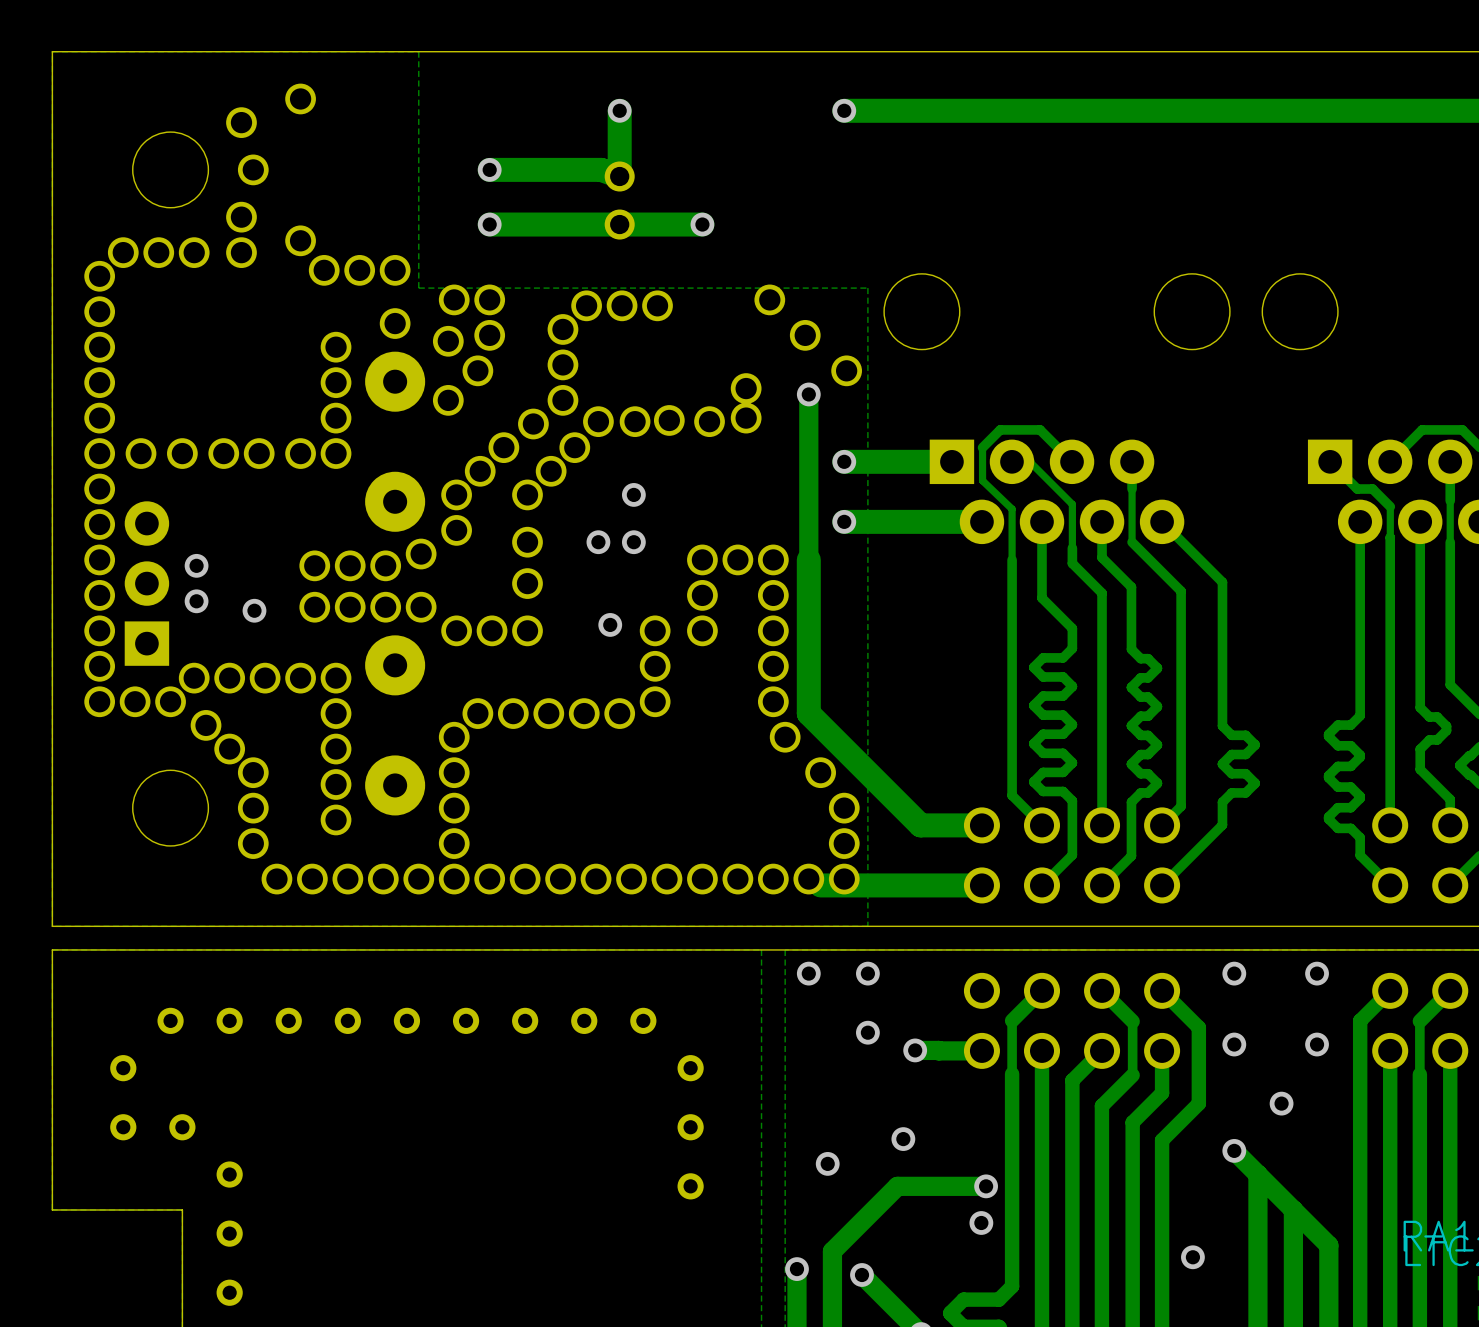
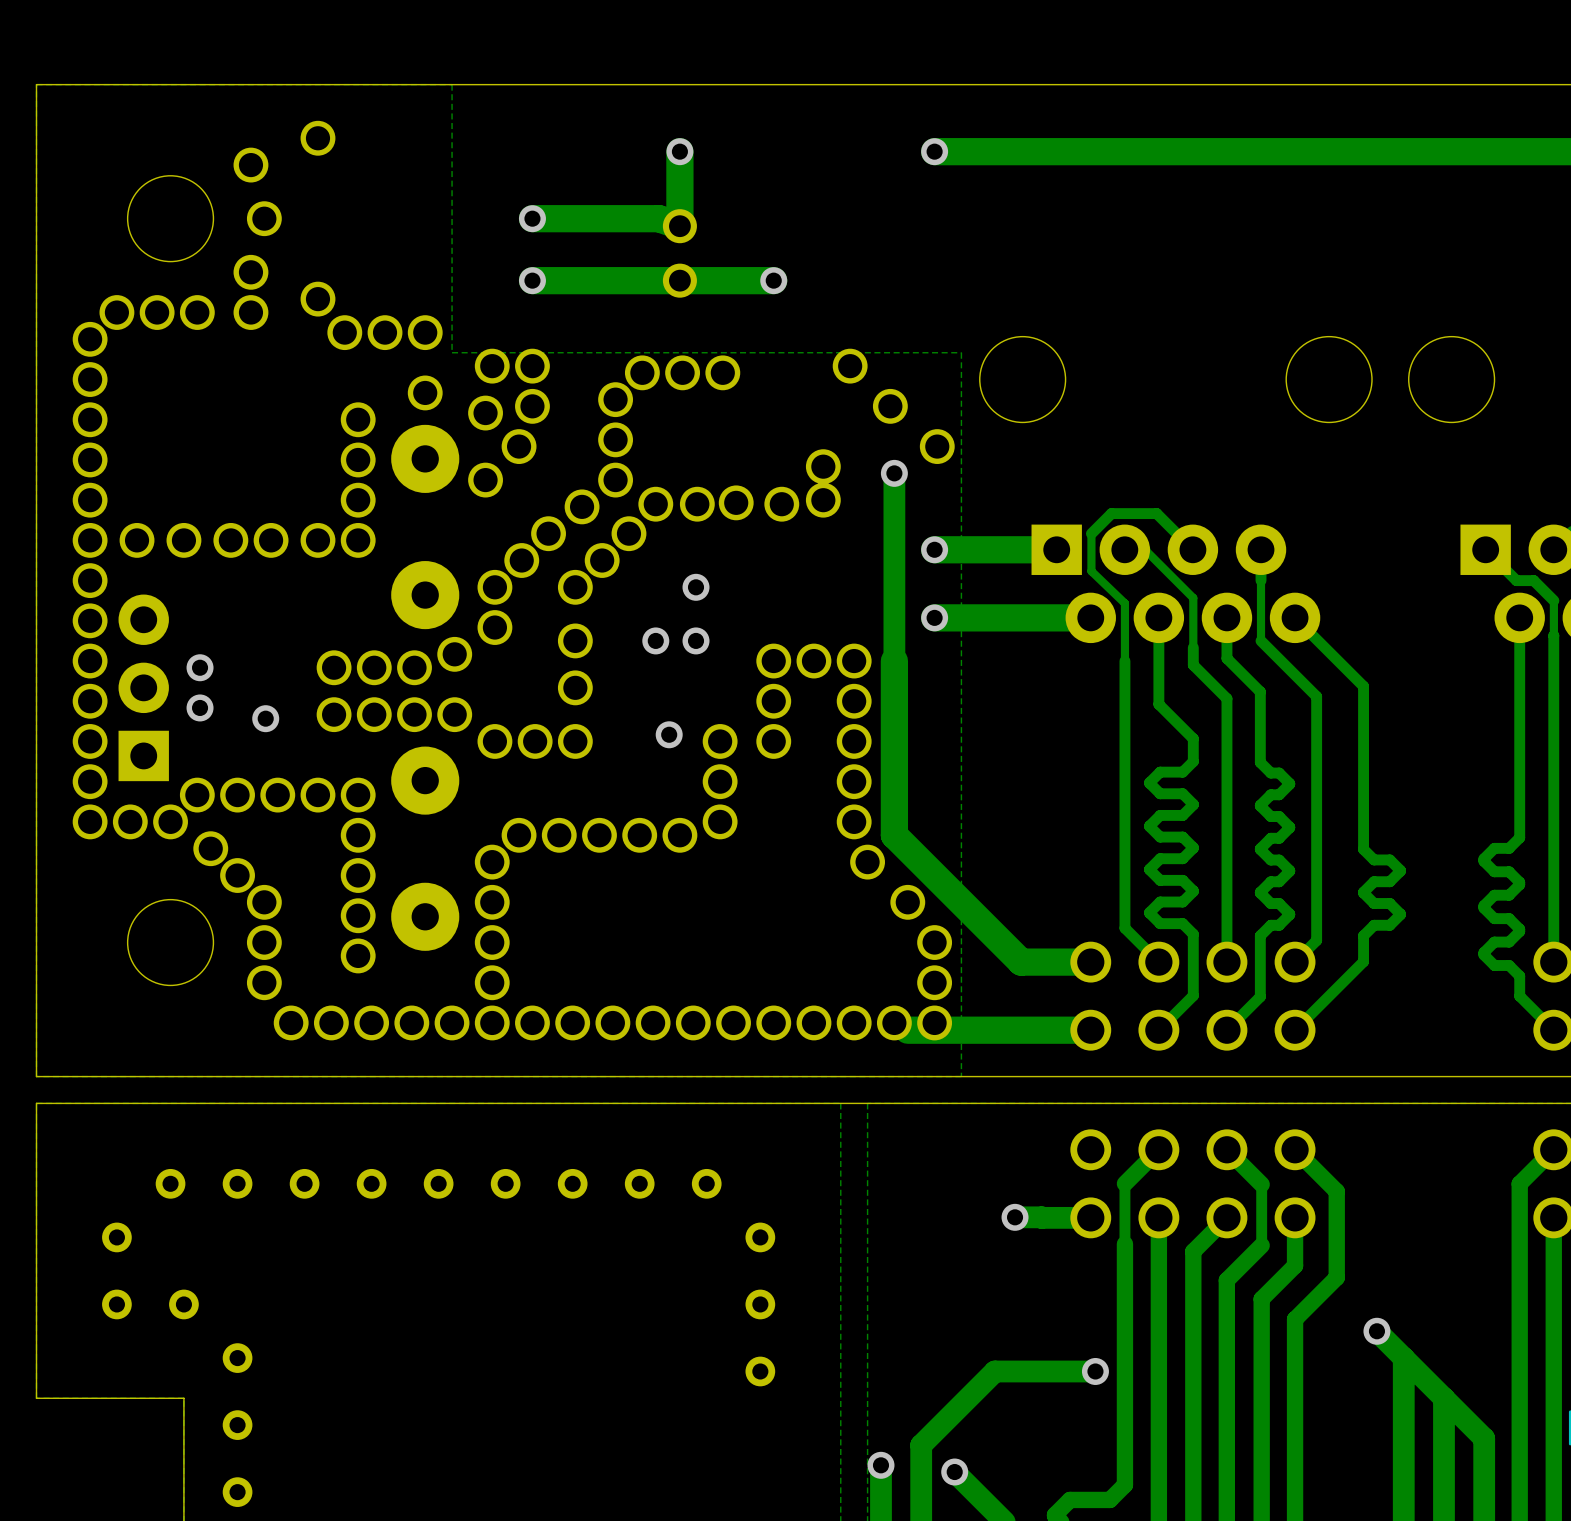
via: (808, 973) -> none
via: (867, 973) -> none
via: (1234, 973) -> none
via: (1317, 973) -> none
via: (867, 1032) -> none
via: (1234, 1044) -> none
via: (1317, 1044) -> none
via: (1281, 1103) -> none
via: (903, 1139) -> none
via: (827, 1163) -> none
via: (981, 1222) -> none
via: (1192, 1257) -> none

